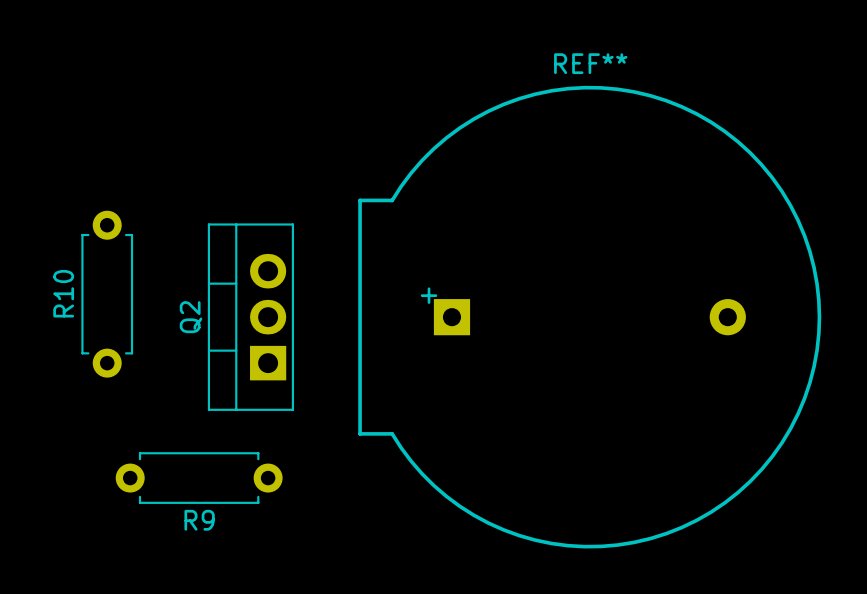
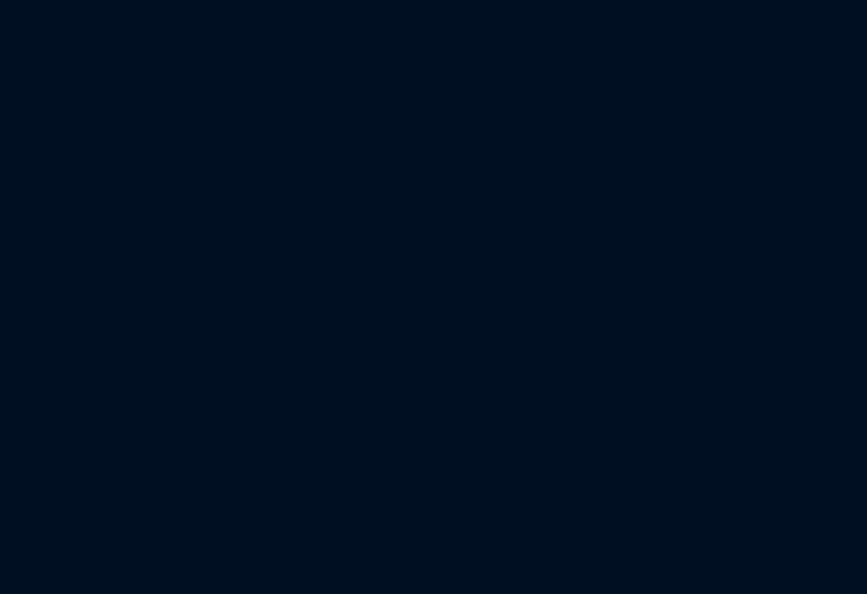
R10: (107, 294) -> none
Q2: (250, 317) -> none
part: (589, 317) -> none
R9: (199, 478) -> none

